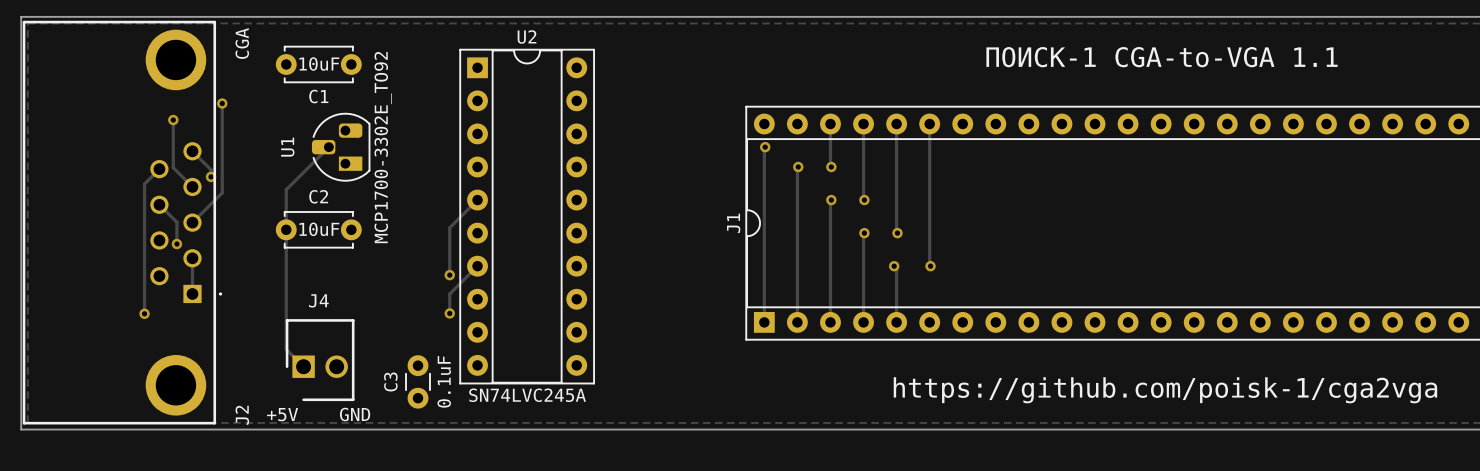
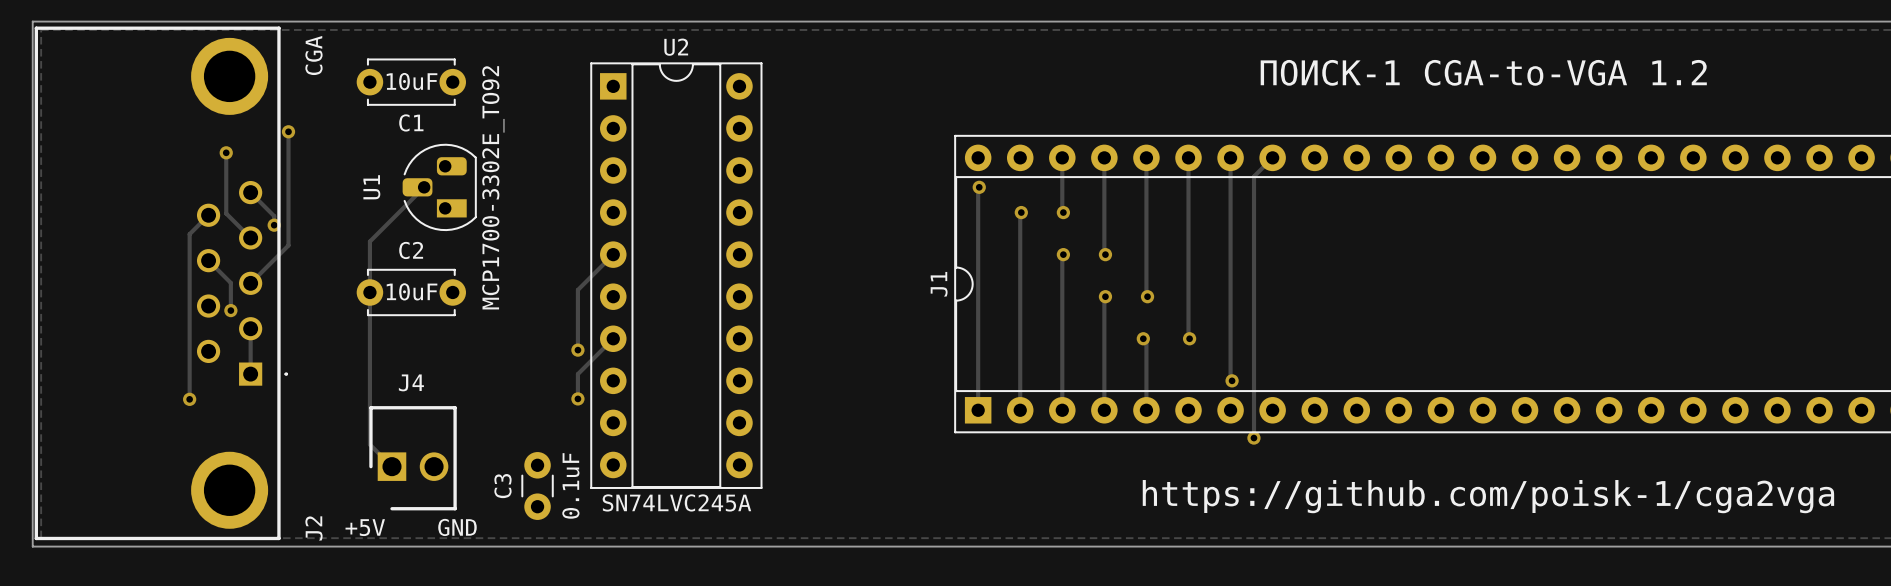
text: ПОИСК-1 CGA-to-VGA 1.1 (1161, 57) -> ПОИСК-1 CGA-to-VGA 1.2 (1483, 72)
track: none -> (1230, 157) (1230, 379) (1232, 380)
track: none -> (1272, 157) (1254, 176) (1254, 437)
via: none -> (1232, 380)
via: none -> (1253, 438)

